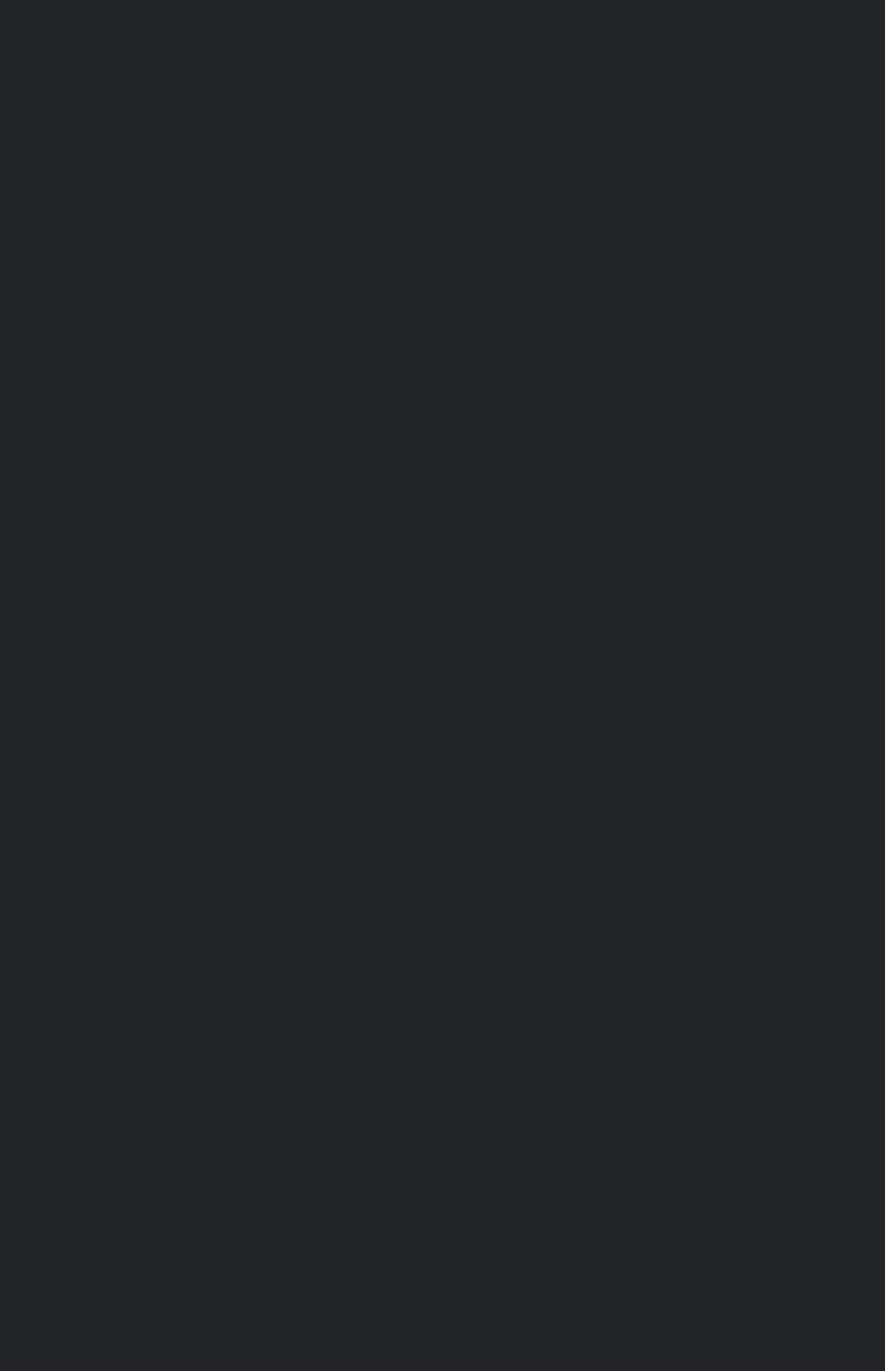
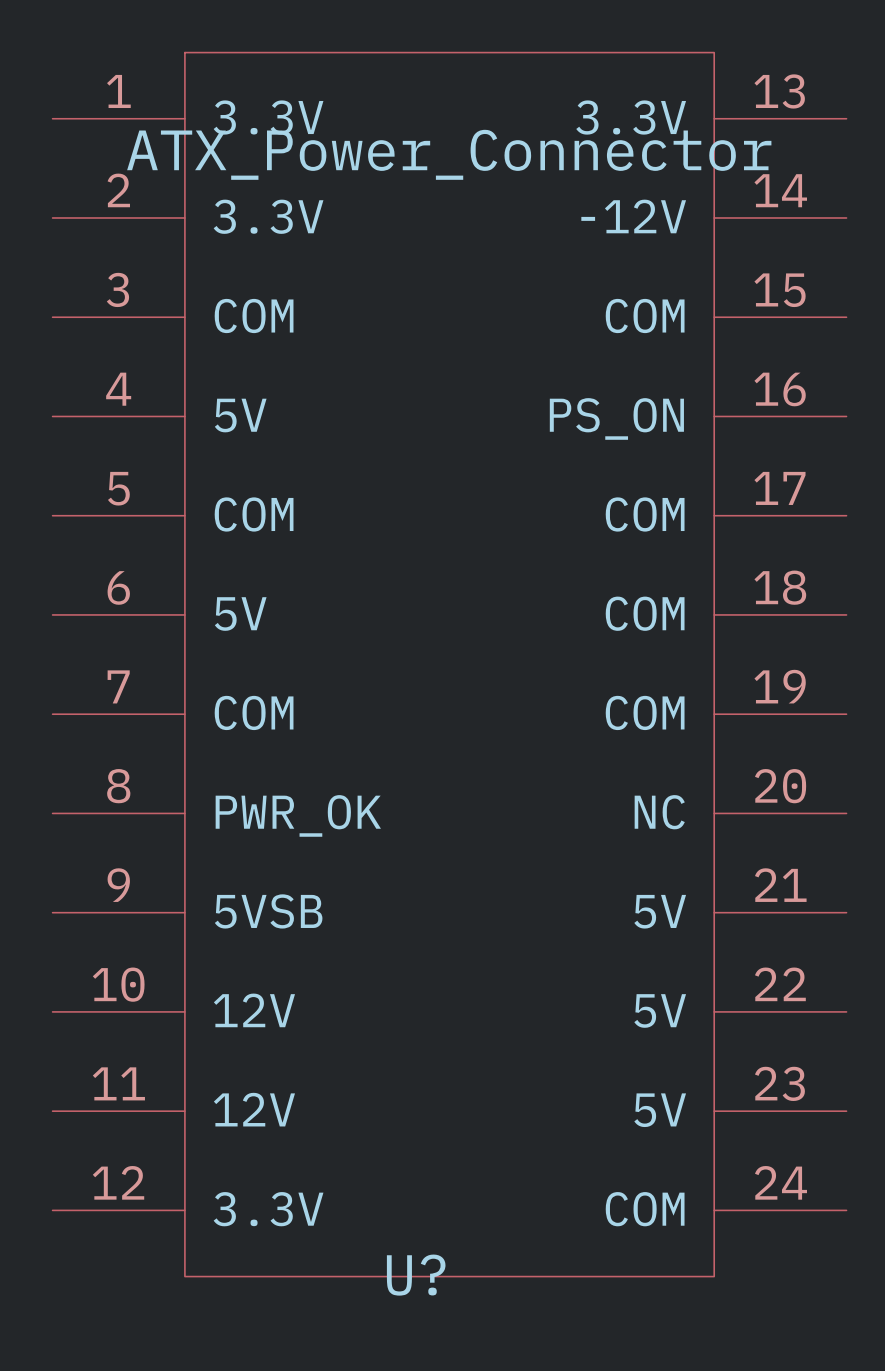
U?: none -> ATX_Power_Connector (449, 664)

